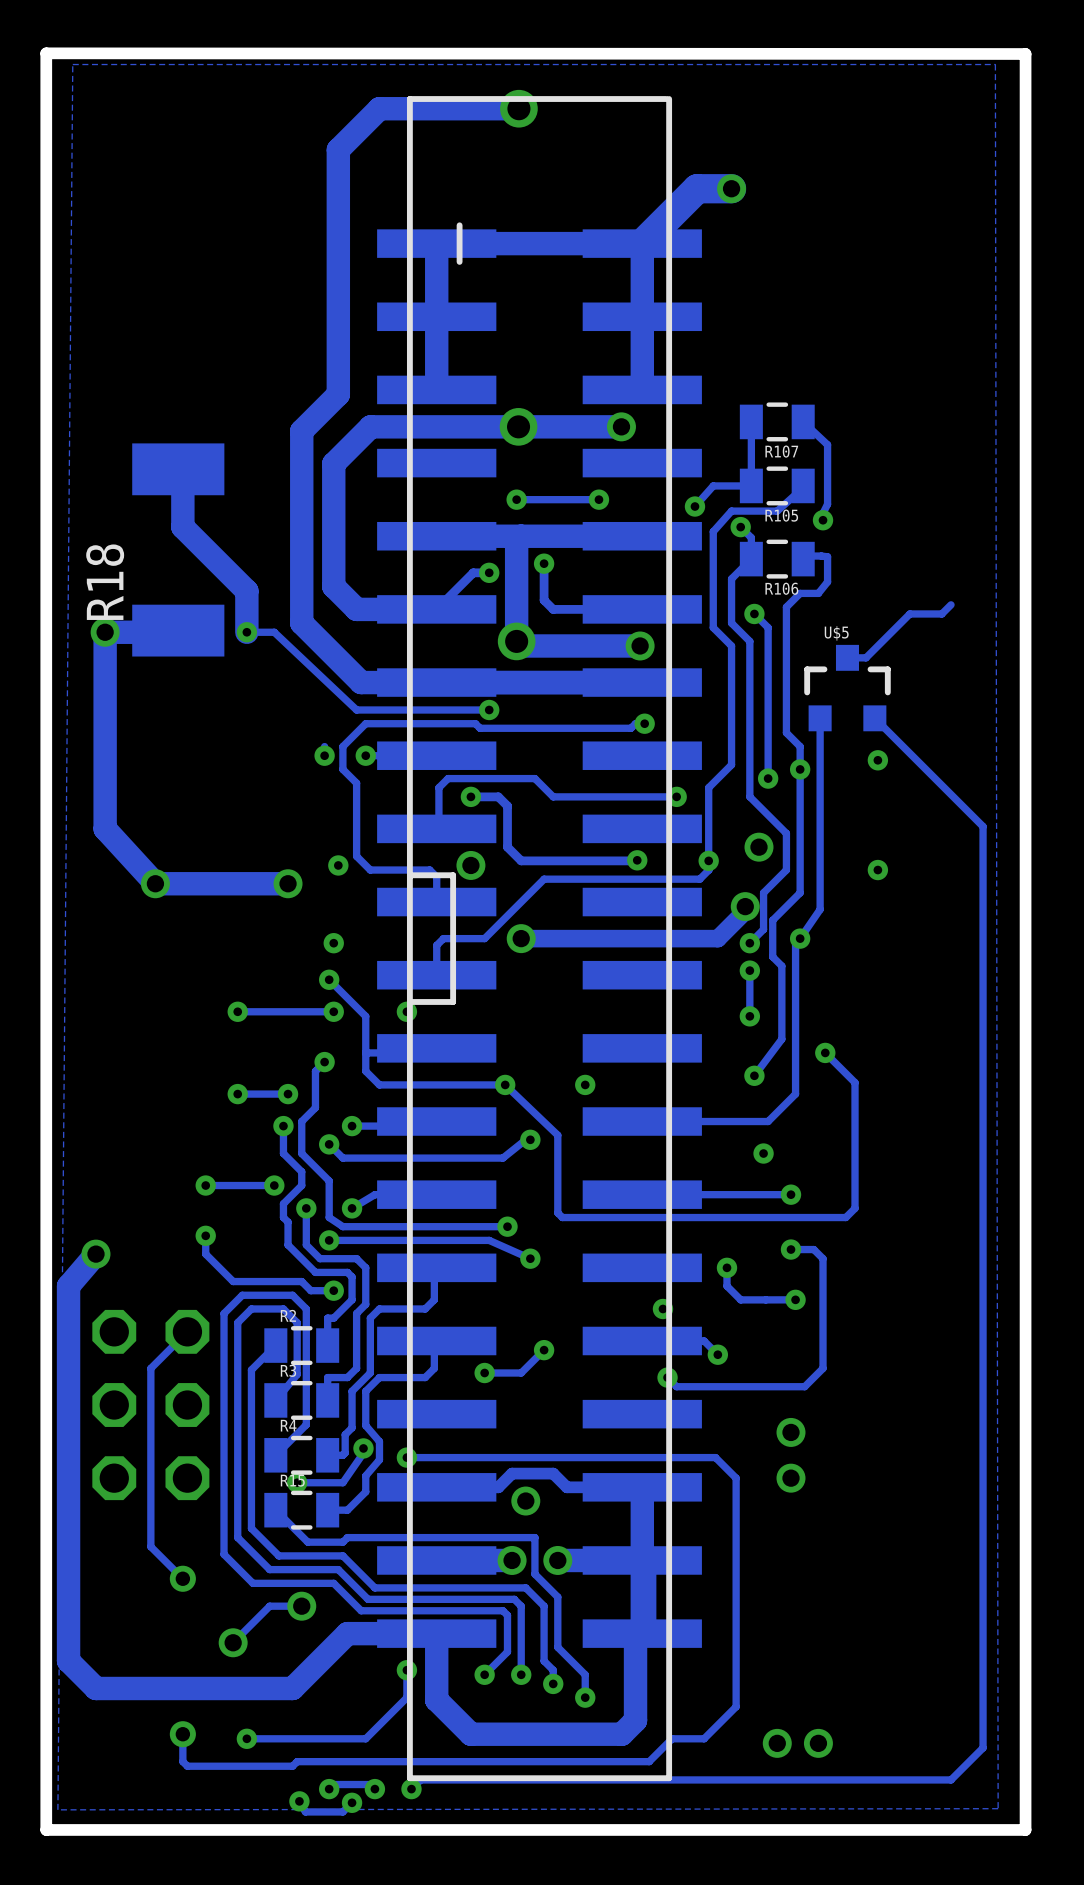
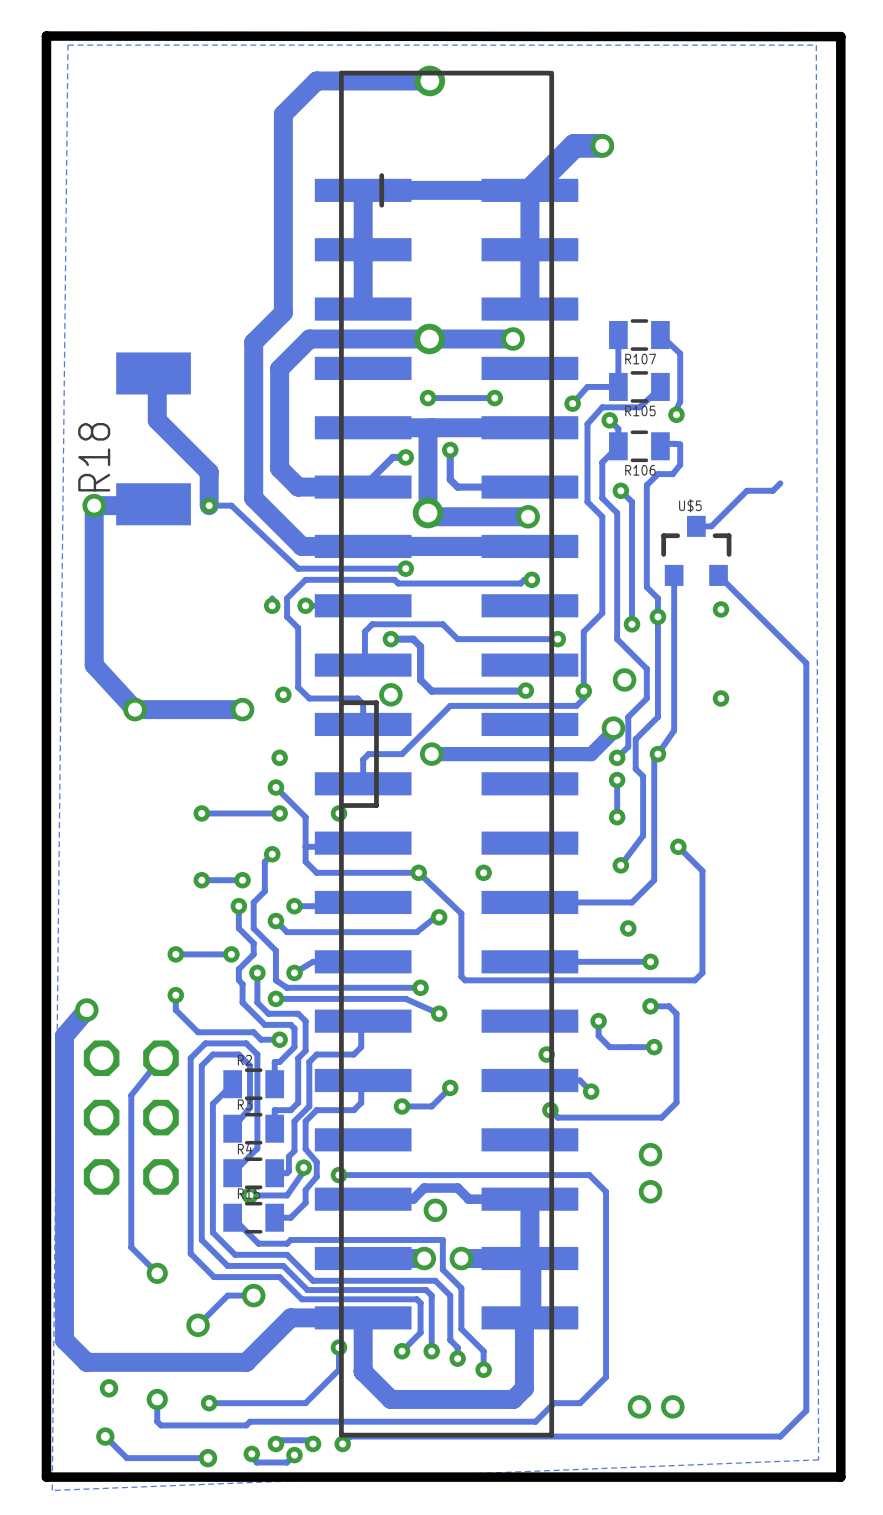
zone outline: (72, 64) (57, 1809) (998, 1808) -> (67, 45) (52, 1490) (818, 1459)
track: (187, 1331) (150, 1368) -> (160, 1058) (131, 1095) (131, 1102)
part position: (150, 1405) -> (131, 1117)
via: none -> (109, 1388)
track: none -> (105, 1436) (126, 1458) (208, 1458)
via: none -> (105, 1436)
via: none -> (208, 1458)

